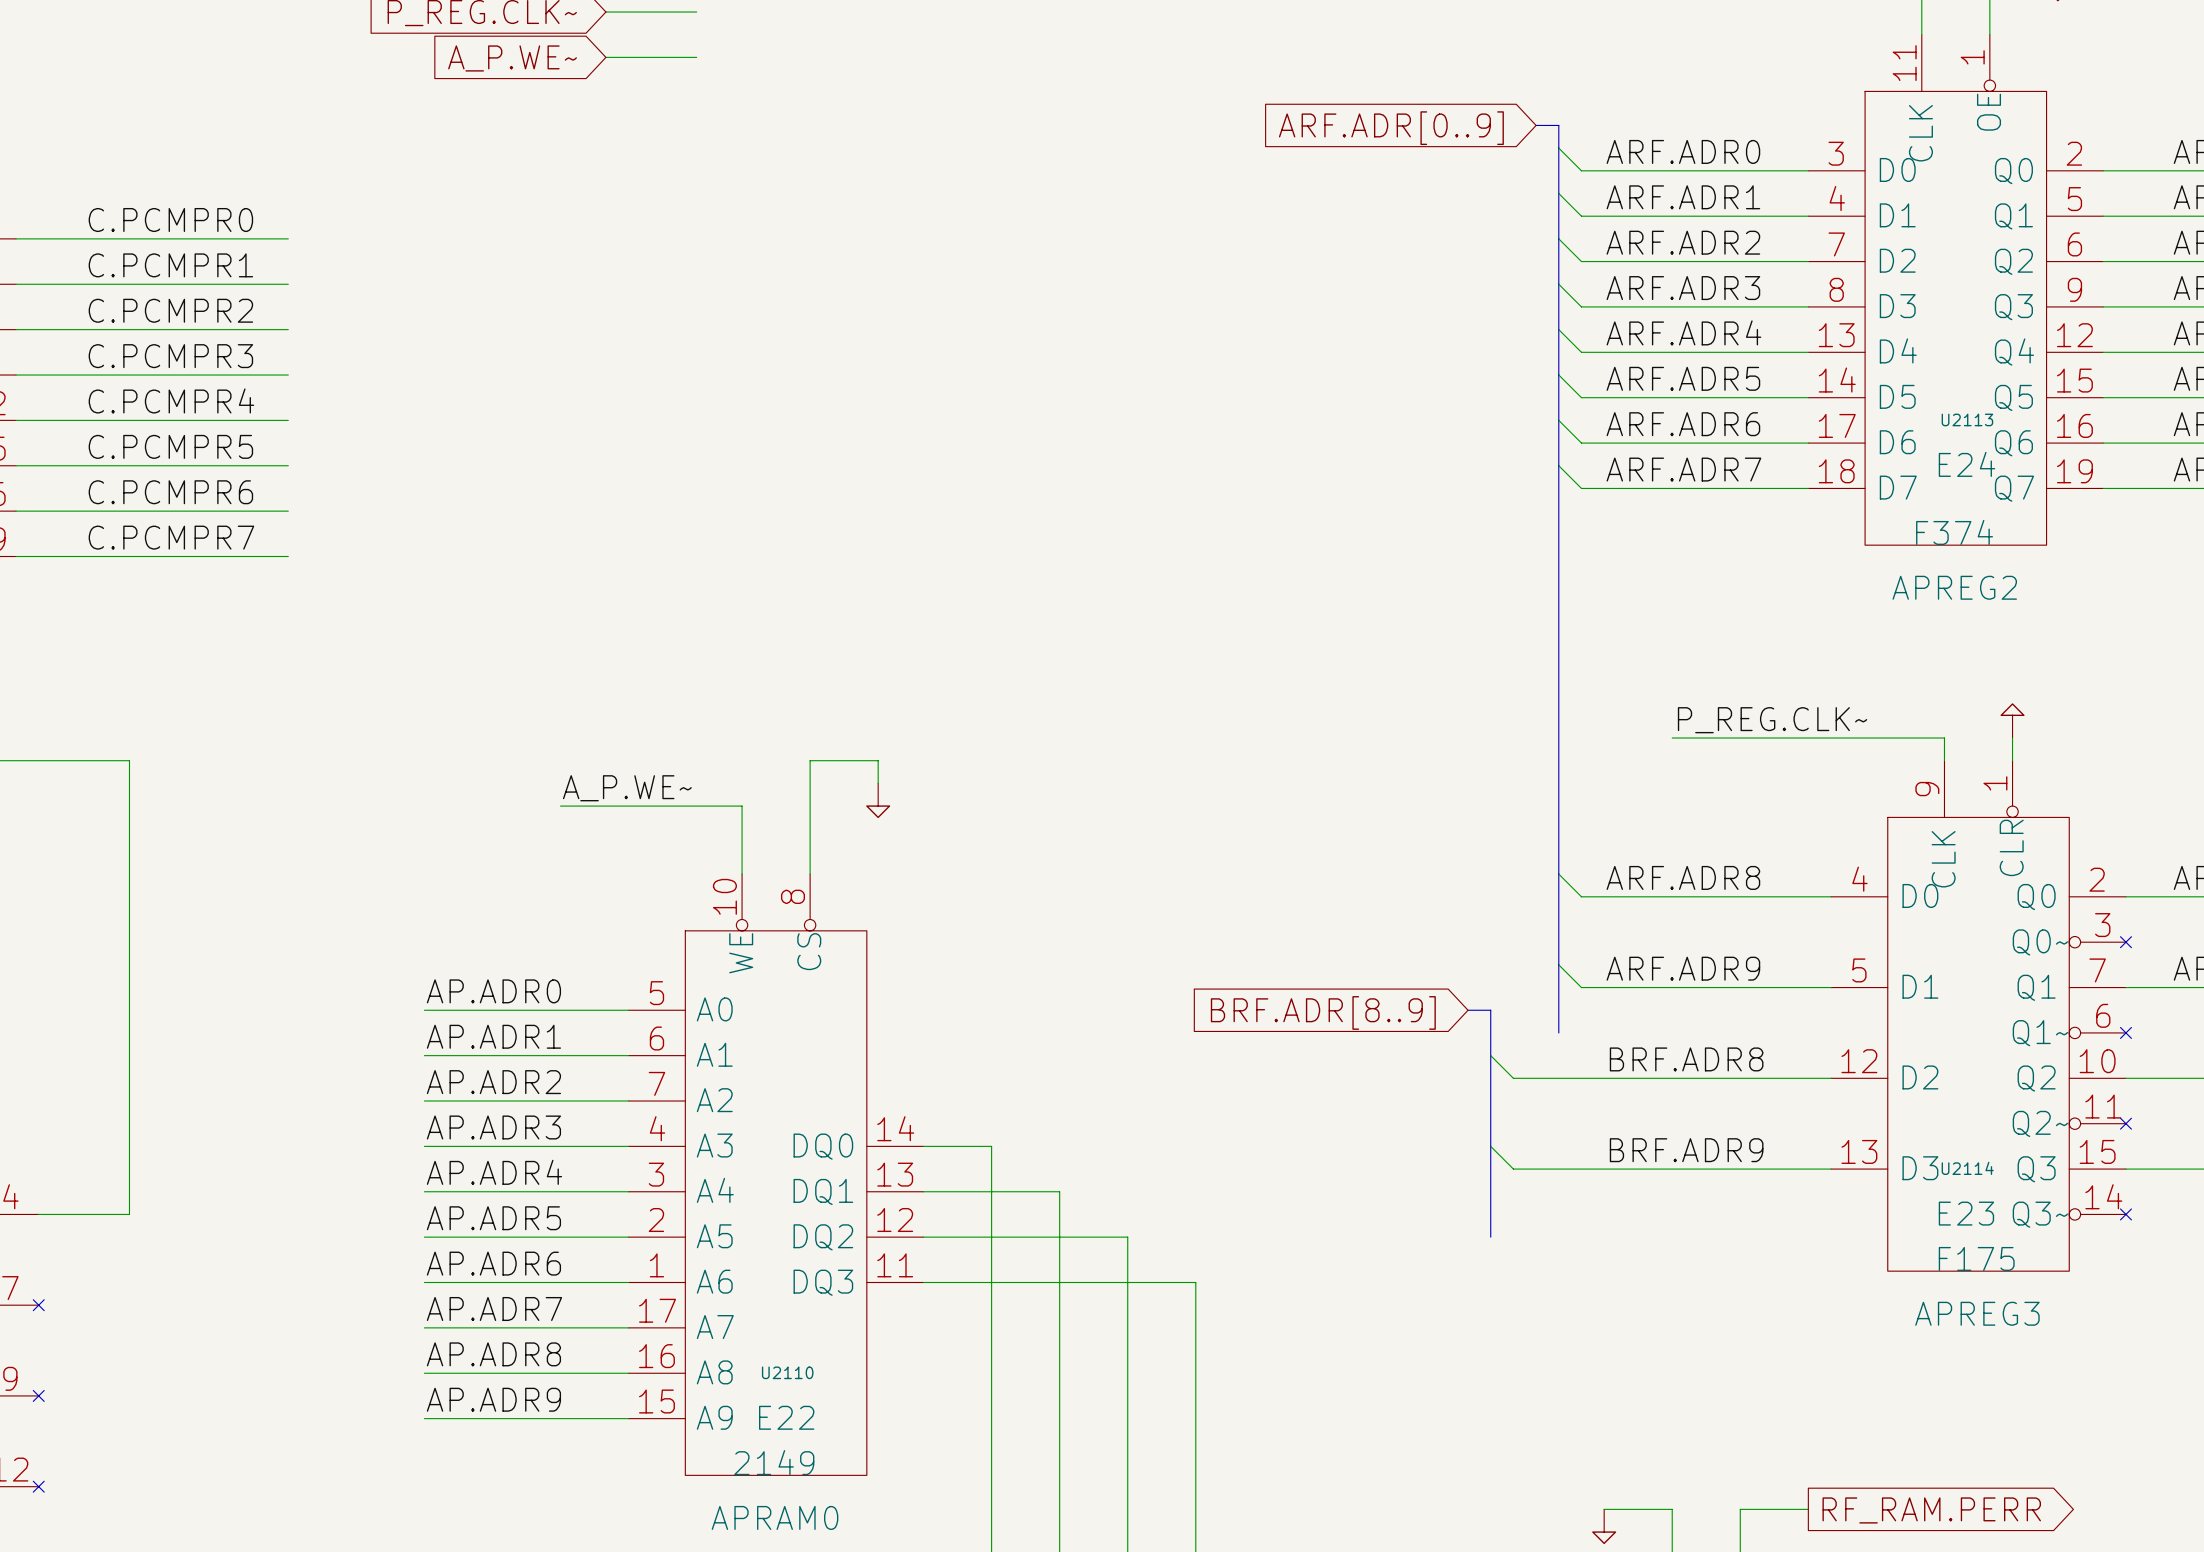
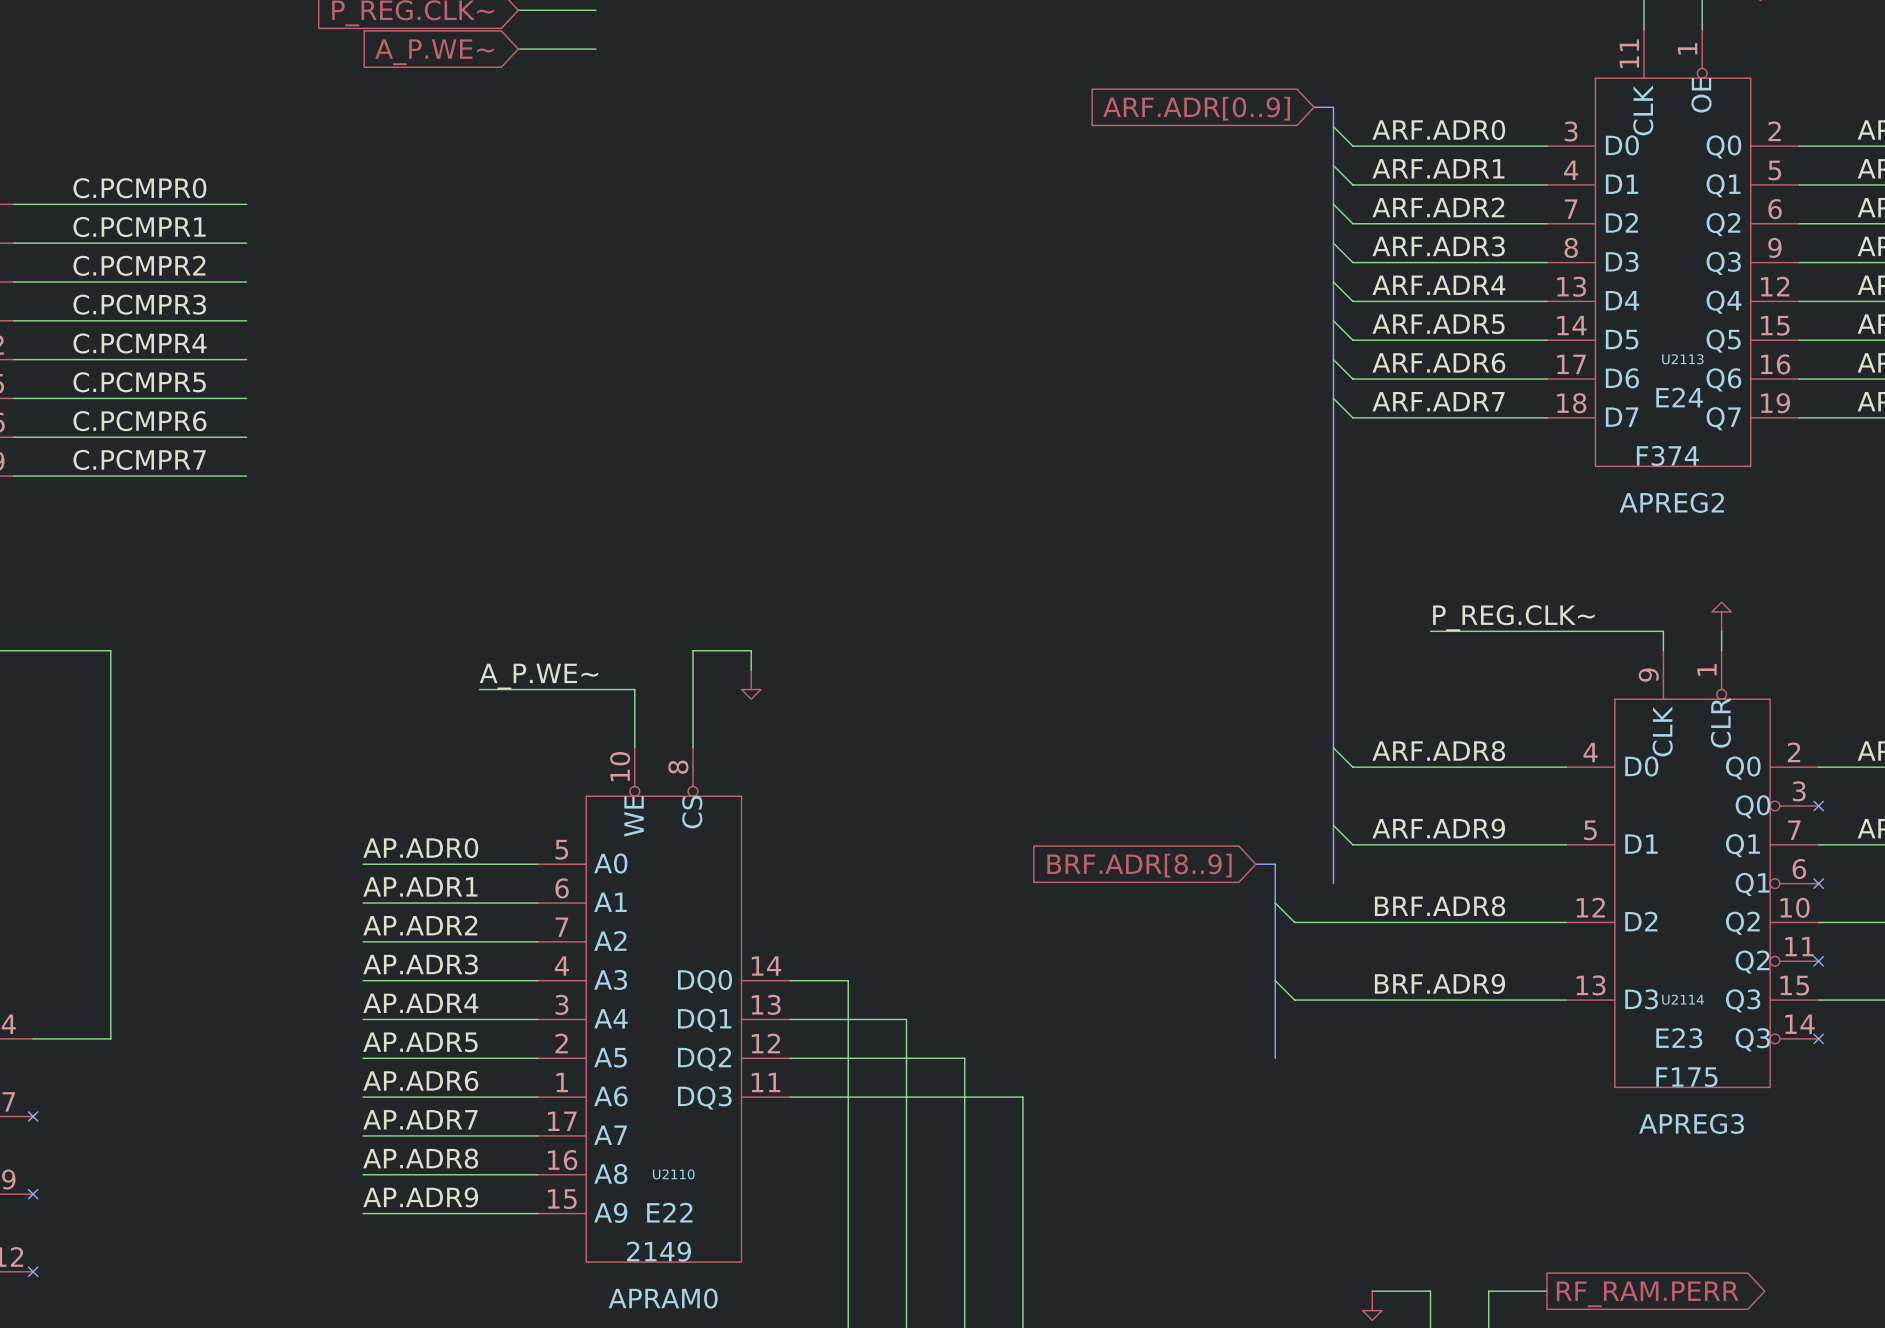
U2114 pin name: Q0~ (2040, 942) -> Q0 (1753, 806)
U2114 pin name: Q1~ (2040, 1033) -> Q1 (1752, 884)
U2114 pin name: Q2~ (2040, 1123) -> Q2 (1752, 962)
U2114 pin name: Q3~ (2040, 1214) -> Q3 (1752, 1039)

